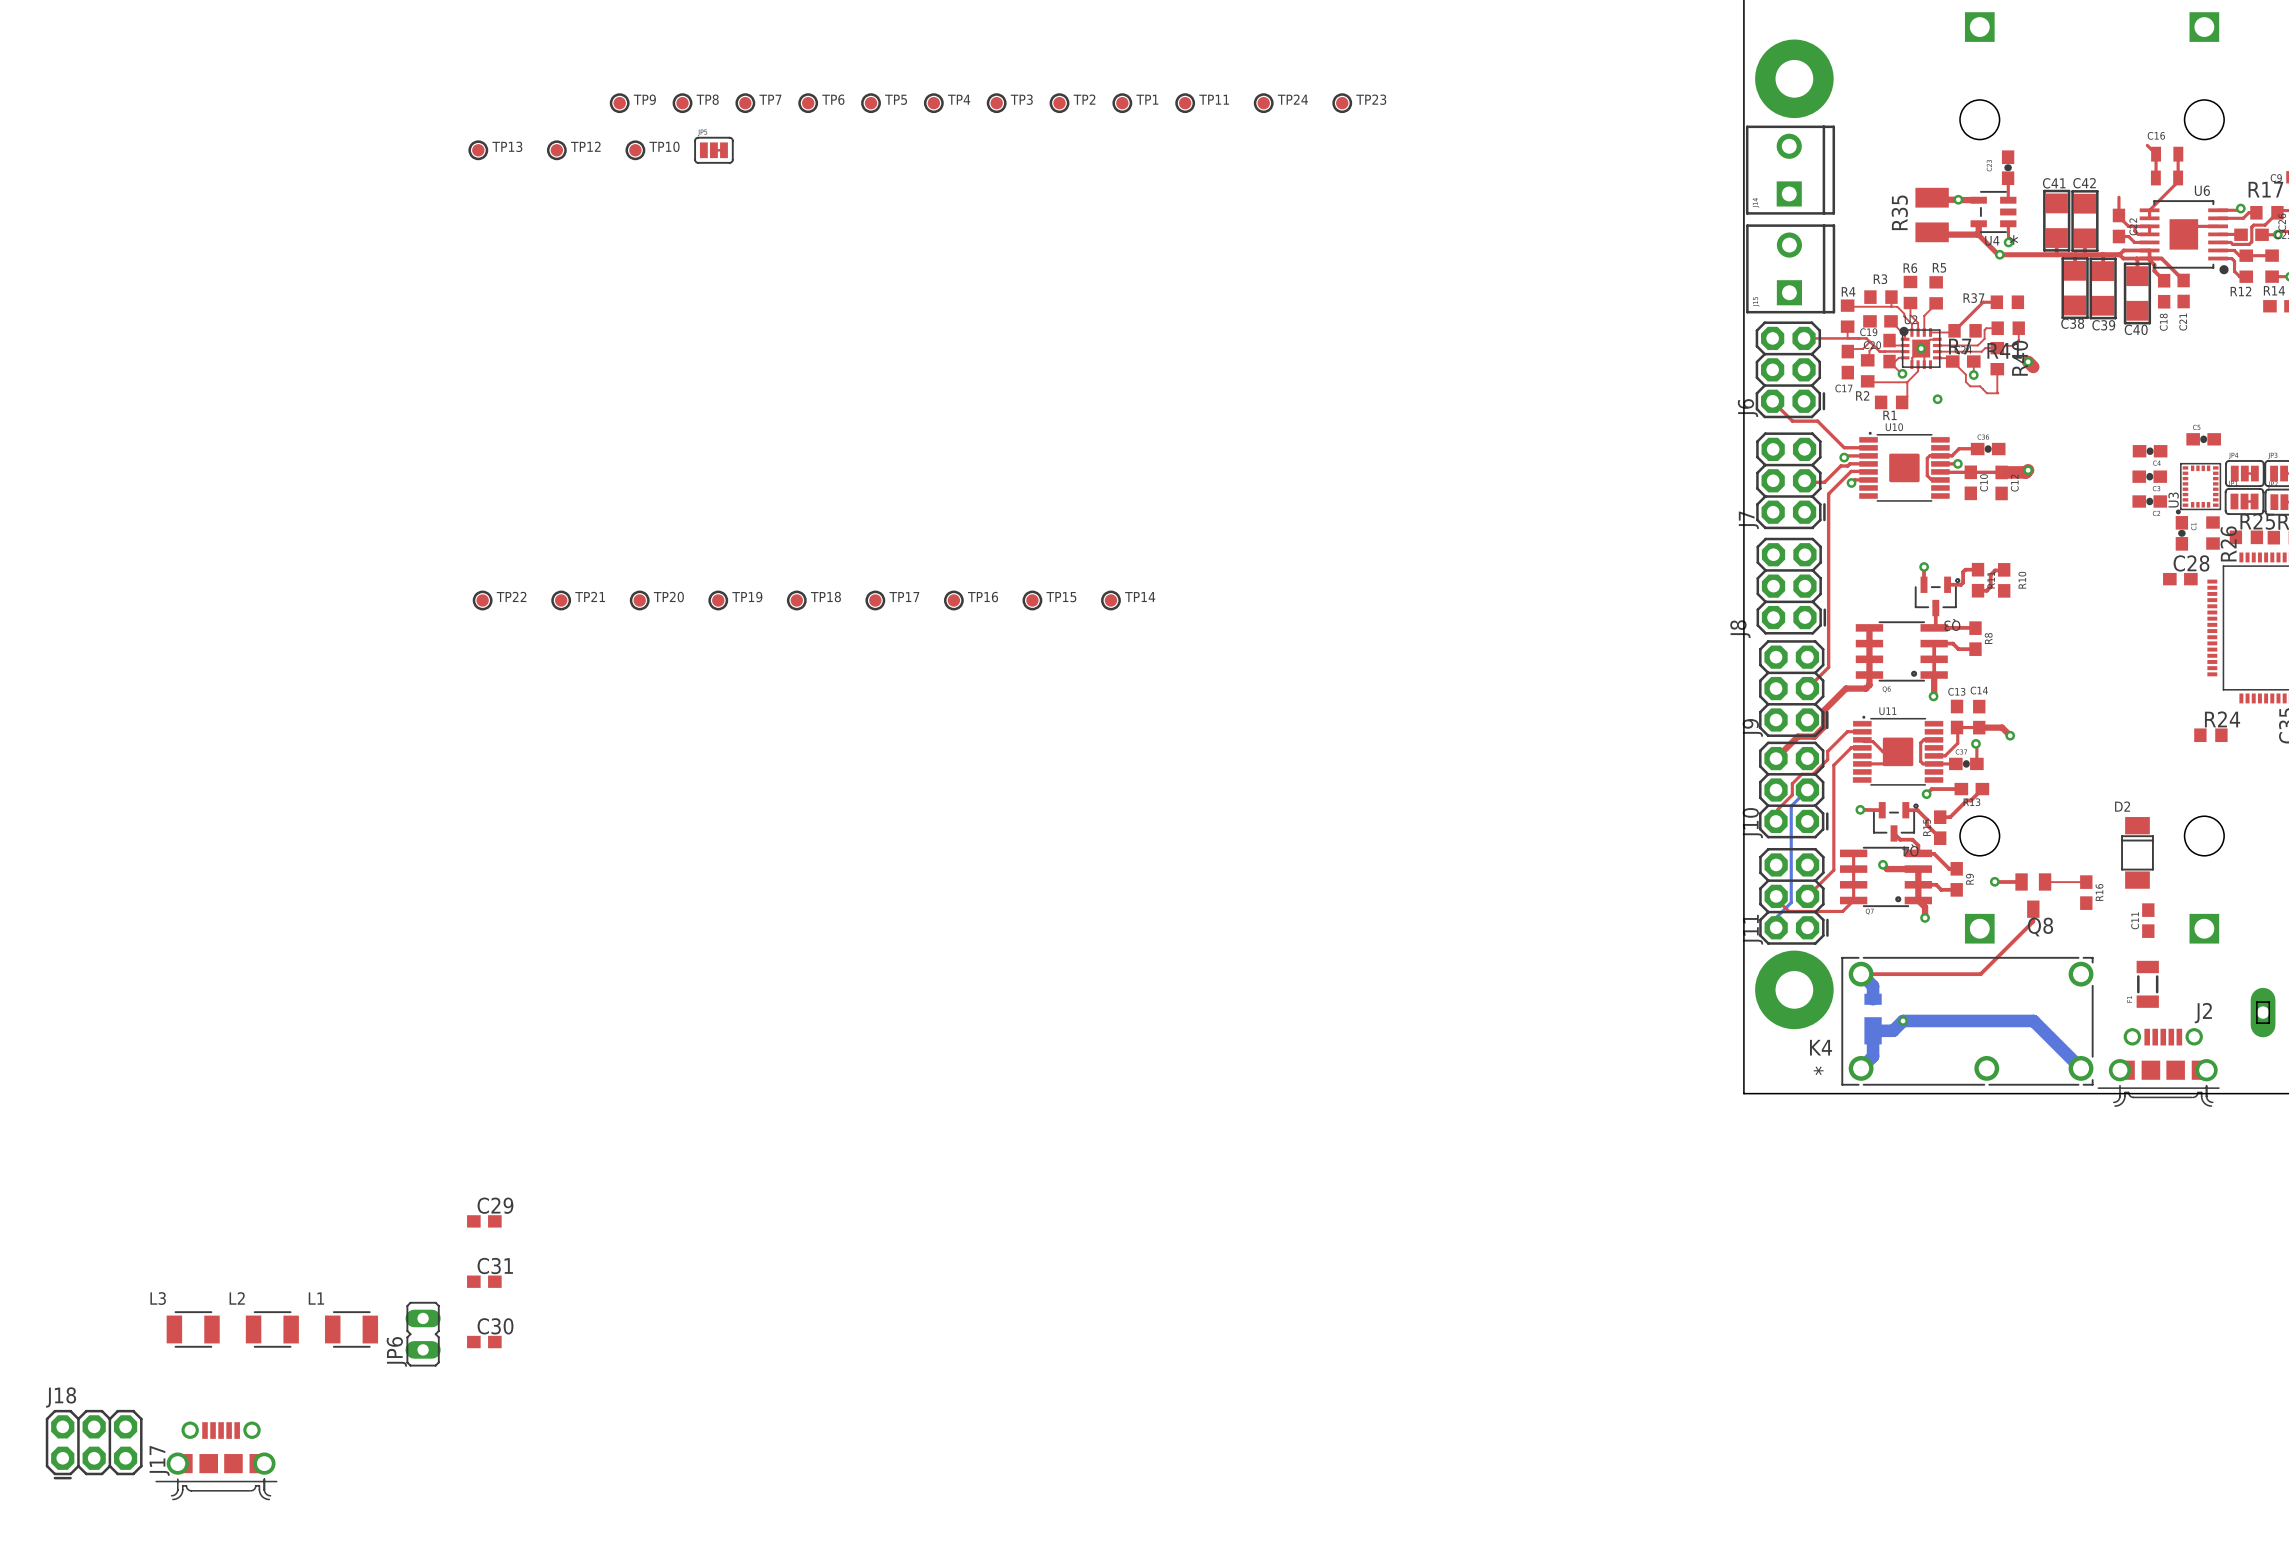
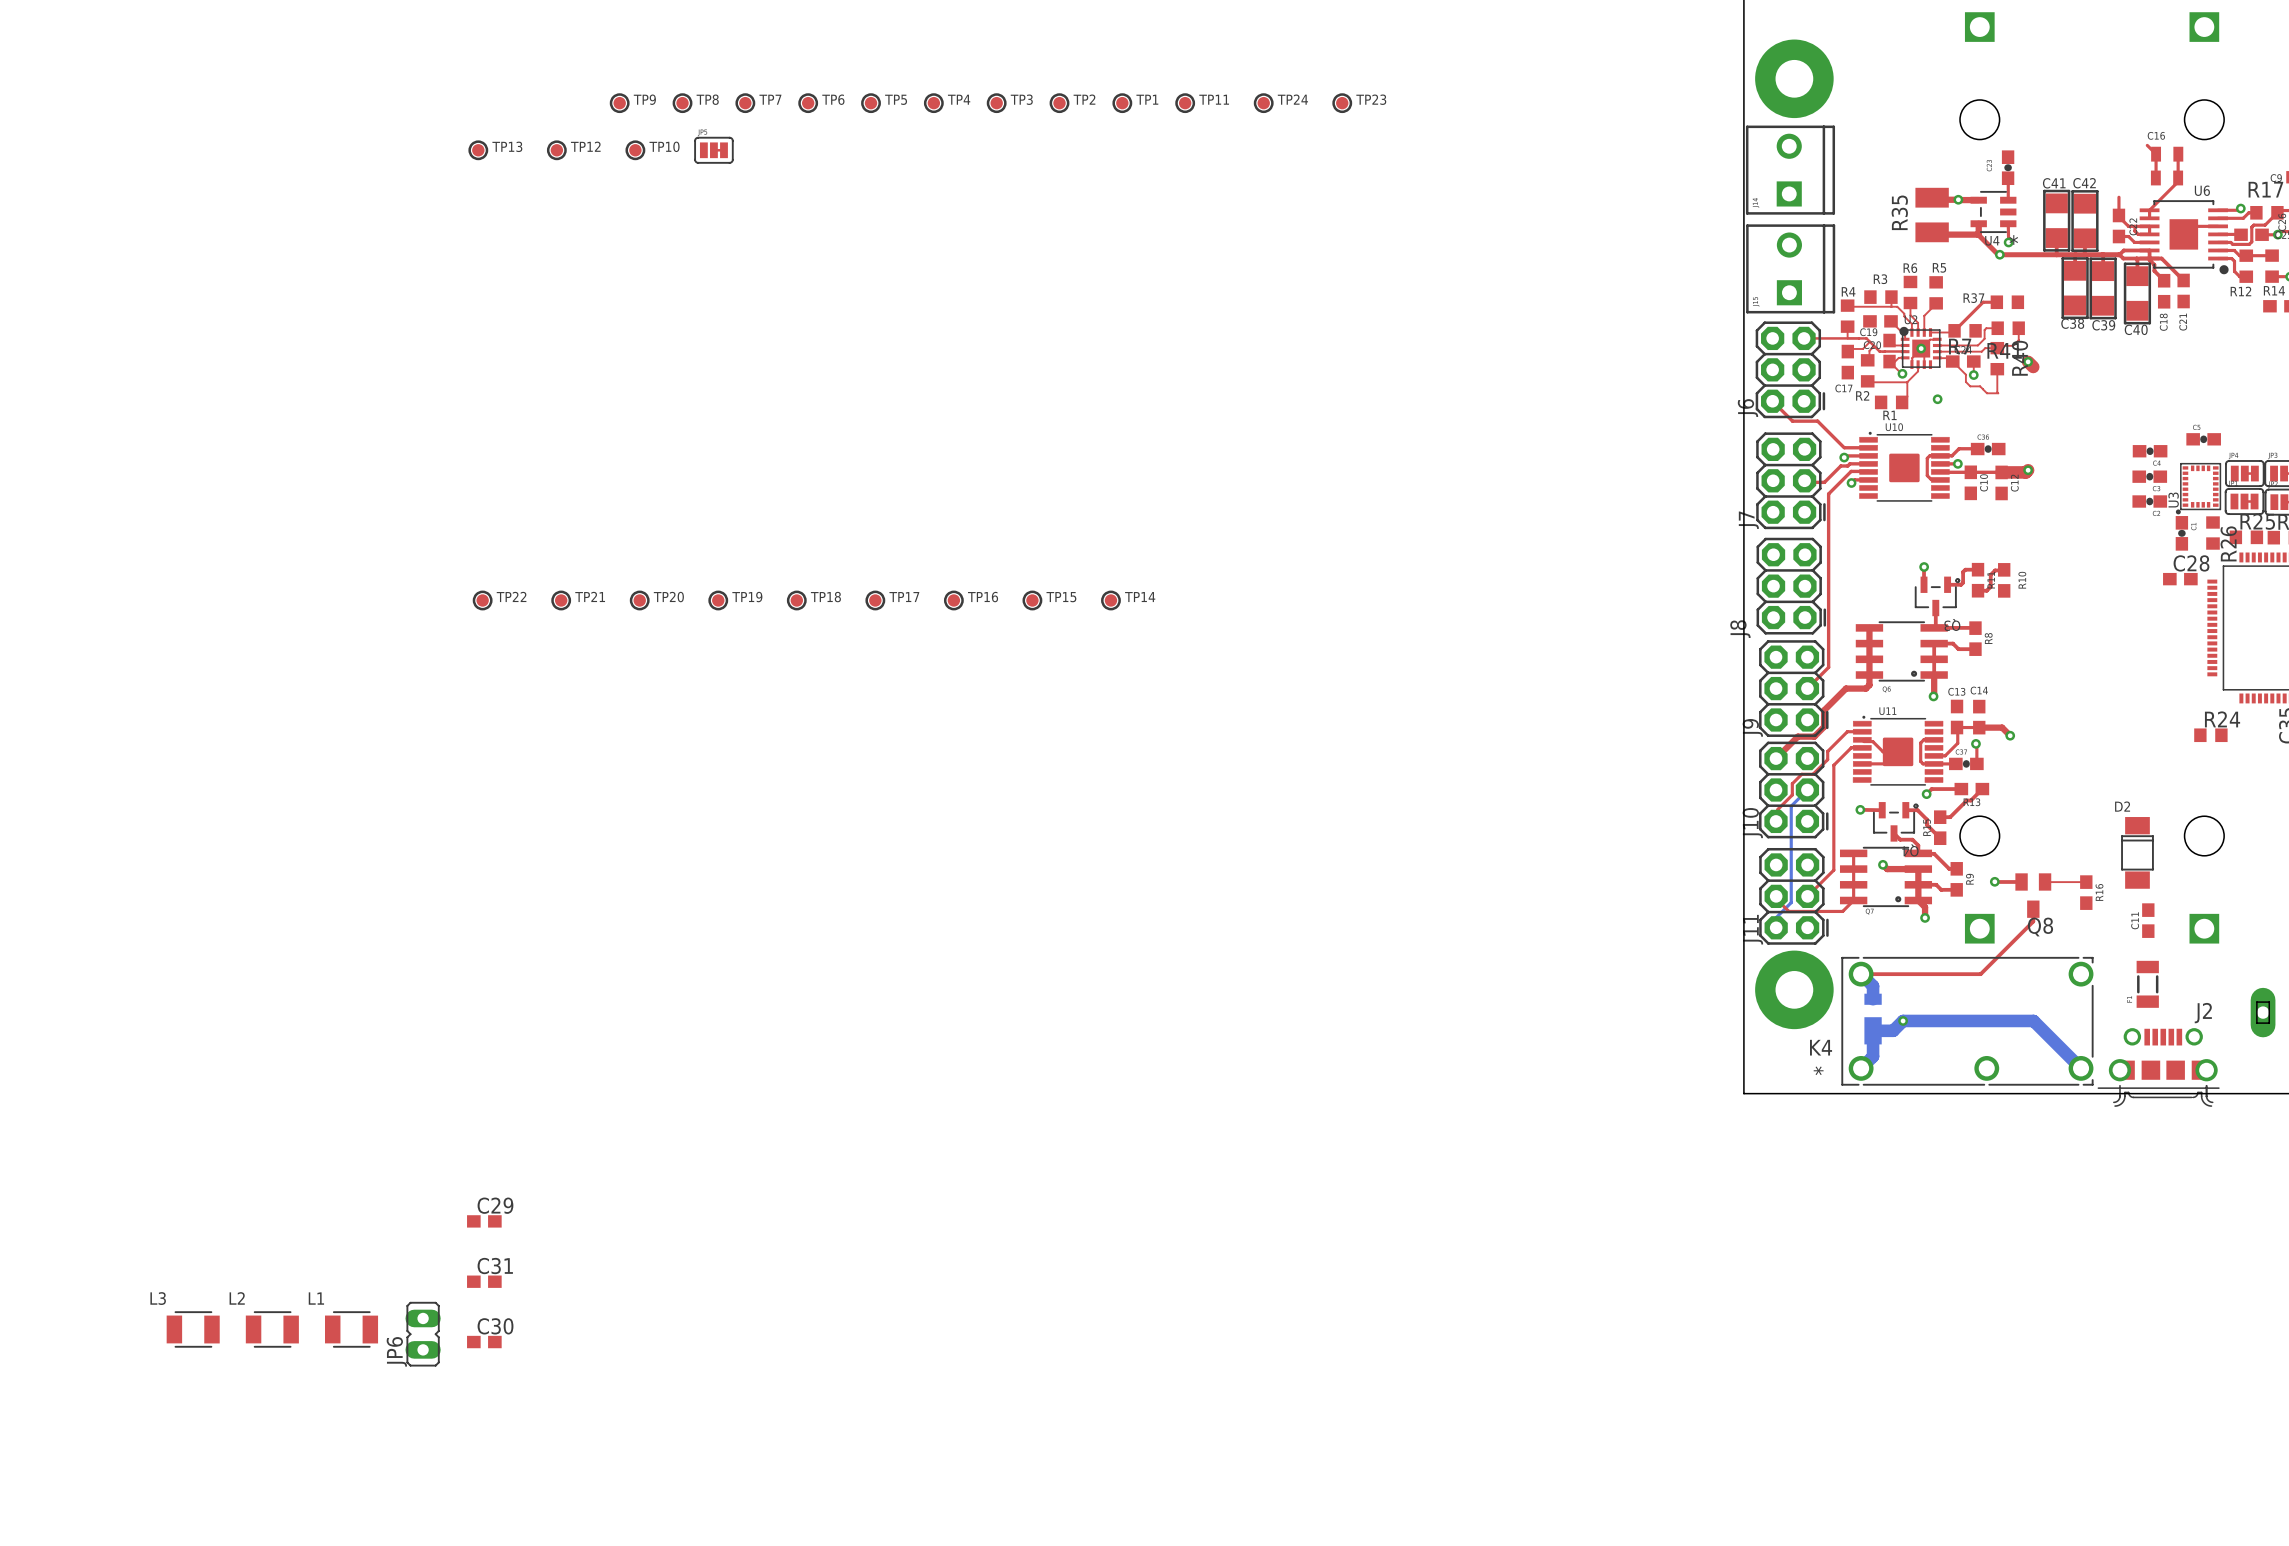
J18: (94, 1444) -> none
J17: (216, 1460) -> none

